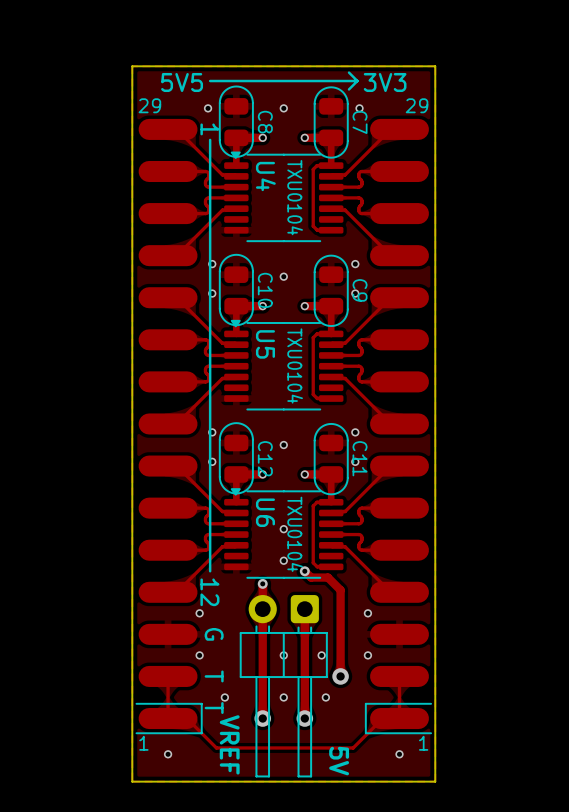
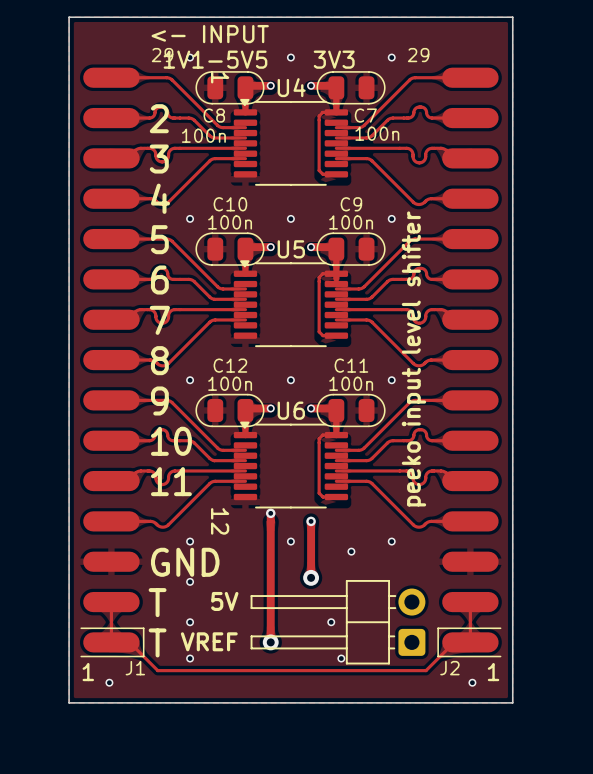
board edge: (132, 66) (132, 781) -> (145, 17) (69, 17) (69, 702) (145, 702)
board edge: (435, 66) (435, 781) -> (436, 17) (512, 17) (512, 702) (436, 702)
line: (349, 72) (357, 81) -> none
line: (210, 81) (357, 81) -> none
line: (357, 81) (349, 89) -> none
text: 5V5 (182, 82) -> none
text position: 3V3 (385, 82) -> 3V3 (334, 59)
text: none -> <- INPUT (210, 34)
via position: (208, 108) -> (190, 57)
via position: (359, 108) -> (391, 57)
text: none -> 1V1-5V5 (215, 59)
C8 rotation: 0° (236, 121) -> 90° counterclockwise (229, 87)
C8 name position: C8 (265, 122) -> C8 (214, 115)
C7 rotation: 0° (331, 122) -> 90° clockwise (351, 87)
track: none -> (111, 77) (169, 78) (218, 126) (245, 127)
track: (168, 129) (176, 129) (222, 174) (236, 176) -> none
track: (399, 129) (390, 129) (345, 174) (331, 176) -> none
track: none -> (470, 77) (412, 78) (363, 126) (336, 127)
line: (210, 139) (210, 571) -> none
track: none -> (111, 118) (150, 117) (154, 115) (156, 108) (160, 107) (166, 108) (170, 117) (179, 118)
track: (177, 171) (206, 171) (208, 174) (205, 181) (207, 186) (236, 187) -> (188, 118) (193, 119) (214, 137)
track: (390, 171) (361, 171) (358, 174) (362, 181) (360, 186) (331, 187) -> (393, 118) (388, 119) (368, 137) (336, 137)
track: none -> (401, 118) (411, 117) (415, 109) (419, 107) (424, 108) (427, 115) (430, 117) (470, 118)
text: none -> 2 (159, 118)
U4 name rotation: 0° (265, 176) -> 90° counterclockwise (291, 87)
C7 value: none -> 100n (377, 133)
C8 value: none -> 100n (203, 135)
track: none -> (214, 137) (245, 137)
track: (236, 197) (207, 198) (205, 203) (208, 210) (206, 213) (168, 213) -> none
U4 value: TXU0104 (295, 197) -> none
track: (331, 197) (360, 198) (362, 203) (358, 210) (361, 213) (399, 213) -> none
track: none -> (245, 148) (174, 148) (169, 151) (167, 159) (162, 161) (157, 159) (152, 149) (140, 148) (127, 158) (111, 158)
track: none -> (336, 148) (408, 148) (412, 151) (414, 160) (418, 162) (424, 160) (426, 151) (431, 148) (443, 148) (454, 158) (470, 158)
track: (236, 208) (222, 210) (176, 255) (168, 255) -> none
track: (331, 208) (345, 210) (390, 255) (399, 255) -> none
track: none -> (245, 158) (211, 159) (164, 204) (159, 203) (151, 198) (111, 198)
track: none -> (336, 158) (370, 159) (416, 204) (422, 203) (430, 198) (470, 198)
text: none -> 3 (159, 159)
text: none -> 4 (160, 198)
via: (212, 264) -> none
via: (355, 264) -> none
via: none -> (190, 218)
via: none -> (391, 218)
C10 value: none -> 100n (230, 222)
C9 value: none -> 100n (351, 222)
C10 rotation: 0° (236, 289) -> 90° counterclockwise (229, 249)
C9 rotation: 0° (331, 290) -> 90° clockwise (351, 249)
C9 name position: C9 (360, 290) -> C9 (351, 204)
via: (212, 293) -> none
via: (355, 293) -> none
track: none -> (111, 239) (169, 239) (218, 287) (245, 289)
track: (168, 297) (176, 297) (222, 343) (236, 344) -> none
track: (399, 297) (390, 297) (345, 343) (331, 344) -> none
track: none -> (470, 239) (412, 239) (363, 287) (336, 289)
text: none -> 5 (159, 239)
track: none -> (111, 279) (150, 279) (154, 276) (156, 270) (160, 268) (166, 270) (170, 278) (179, 279)
track: (177, 339) (206, 339) (208, 343) (205, 350) (207, 355) (236, 355) -> (188, 279) (193, 281) (214, 299)
track: (390, 339) (361, 339) (358, 343) (362, 350) (360, 355) (331, 355) -> (393, 279) (388, 281) (368, 298) (336, 299)
track: none -> (401, 279) (411, 278) (415, 270) (419, 268) (424, 270) (427, 276) (430, 279) (470, 279)
text: none -> 6 (159, 280)
U5 name rotation: 0° (265, 344) -> 90° counterclockwise (291, 249)
track: none -> (214, 299) (245, 299)
U5 value: TXU0104 (295, 365) -> none
track: (236, 366) (207, 366) (205, 371) (208, 378) (206, 381) (168, 381) -> none
track: (331, 366) (360, 366) (362, 371) (358, 378) (361, 381) (399, 381) -> none
track: none -> (245, 309) (174, 309) (169, 312) (167, 320) (162, 323) (157, 320) (152, 310) (140, 309) (127, 319) (111, 319)
track: none -> (336, 309) (407, 309) (412, 312) (414, 320) (419, 323) (424, 320) (428, 310) (441, 309) (454, 319) (470, 319)
track: (236, 377) (222, 378) (176, 423) (168, 423) -> none
track: (331, 377) (345, 378) (390, 423) (399, 423) -> none
text: none -> 7 (159, 320)
track: none -> (245, 319) (211, 320) (164, 365) (159, 365) (151, 360) (111, 360)
track: none -> (336, 319) (370, 320) (416, 365) (422, 365) (430, 360) (470, 360)
text: none -> peeko input level shifter (413, 358)
text: none -> 8 (159, 360)
J1: none -> (112, 362)
part: (169, 426) -> none
part: (398, 426) -> none
J2: none -> (469, 362)
via: (212, 432) -> none
via: (355, 432) -> none
via: none -> (190, 380)
via: none -> (391, 380)
C12 value: none -> 100n (230, 383)
C11 value: none -> 100n (351, 383)
C12 rotation: 0° (236, 458) -> 90° counterclockwise (229, 410)
C11 name position: C11 (360, 458) -> C11 (351, 365)
C11 rotation: 0° (331, 459) -> 90° clockwise (351, 410)
via: (212, 461) -> none
via: (355, 461) -> none
track: none -> (111, 400) (169, 400) (218, 448) (245, 450)
text: none -> 9 (159, 400)
track: (168, 466) (176, 466) (222, 511) (236, 513) -> none
track: (399, 466) (390, 466) (345, 511) (331, 513) -> none
track: none -> (470, 400) (412, 400) (363, 448) (336, 450)
track: none -> (111, 440) (150, 440) (154, 438) (156, 431) (160, 429) (166, 431) (170, 439) (179, 440)
text: none -> 10 (171, 441)
track: (177, 508) (206, 508) (208, 511) (205, 518) (207, 523) (236, 523) -> (188, 440) (193, 442) (214, 460)
track: (390, 508) (361, 508) (358, 511) (362, 518) (360, 523) (331, 523) -> (393, 440) (388, 442) (368, 460) (336, 460)
track: none -> (401, 440) (411, 439) (415, 431) (419, 429) (424, 431) (427, 438) (430, 440) (470, 440)
U6 name rotation: 0° (265, 512) -> 90° counterclockwise (291, 410)
track: none -> (214, 460) (245, 460)
via: (283, 529) -> none
track: (236, 534) (207, 535) (205, 539) (208, 546) (206, 550) (168, 550) -> none
U6 value: TXU0104 (295, 534) -> none
track: (331, 534) (360, 535) (362, 539) (358, 546) (361, 550) (399, 550) -> none
track: none -> (245, 470) (174, 471) (169, 473) (167, 482) (162, 484) (157, 482) (152, 471) (140, 471) (127, 481) (111, 481)
track: none -> (336, 470) (407, 471) (412, 473) (414, 482) (419, 484) (424, 482) (428, 471) (441, 471) (454, 481) (470, 481)
track: (236, 545) (222, 546) (176, 592) (168, 592) -> none
track: (331, 545) (345, 546) (390, 592) (399, 592) -> none
text: none -> 11 (171, 481)
track: none -> (245, 481) (211, 482) (164, 526) (159, 526) (151, 521) (111, 521)
track: none -> (336, 481) (370, 482) (416, 526) (422, 526) (430, 521) (470, 521)
via: (283, 560) -> none
track: (304, 571) (311, 577) (327, 577) (340, 590) (340, 676) -> none
via position: (304, 571) -> (311, 521)
track: none -> (311, 521) (311, 537)
via position: (199, 613) -> (190, 541)
via: none -> (290, 541)
via: (367, 613) -> none
via: none -> (391, 541)
via: none -> (351, 551)
text: none -> GND (185, 562)
text: G (214, 634) -> none
track: (304, 651) (304, 718) -> none
via: none -> (311, 577)
via position: (199, 655) -> (190, 581)
via: (283, 655) -> none
via: (321, 655) -> none
via: (367, 655) -> none
track: (168, 676) (168, 718) (187, 718) (216, 747) -> (111, 602) (111, 642) (129, 642) (157, 670) (226, 670)
text: T (214, 676) -> none
via: (340, 676) -> none
track: (399, 676) (399, 718) (382, 718) (353, 747) -> (470, 602) (470, 642) (454, 642) (426, 670) (357, 670)
text: none -> T (157, 602)
part rotation: 0° (283, 686) -> 90° clockwise (337, 622)
via: none -> (190, 622)
via: (224, 697) -> none
via: (283, 697) -> none
text: T (214, 708) -> none
via: (304, 718) -> none
text: none -> T (157, 642)
via: none -> (341, 658)
text position: 1 (143, 743) -> 1 (88, 672)
text position: 1 (423, 743) -> 1 (493, 672)
text rotation: 0° (229, 744) -> 90° counterclockwise (209, 641)
via position: (168, 754) -> (190, 658)
via: (399, 754) -> none
via: none -> (109, 682)
via: none -> (472, 682)
text rotation: 0° (339, 761) -> 90° counterclockwise (224, 601)
text position: 5V (339, 761) -> 5V (224, 601)

